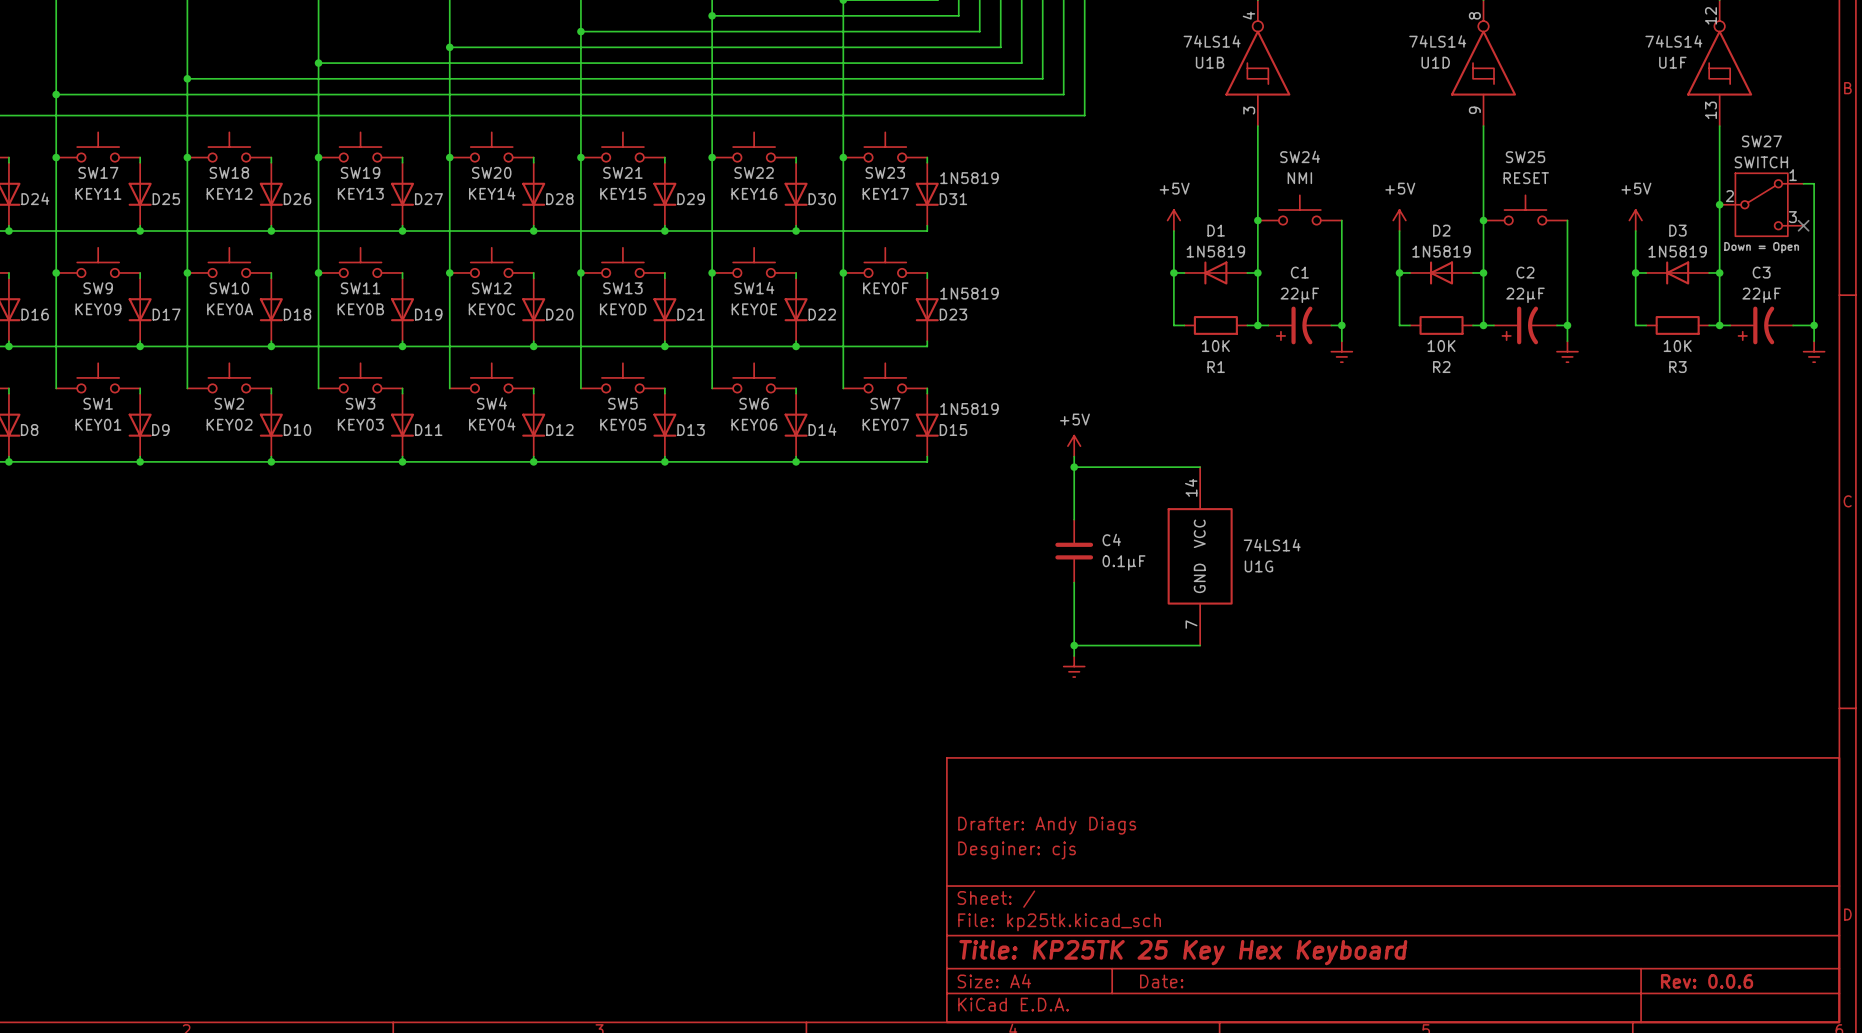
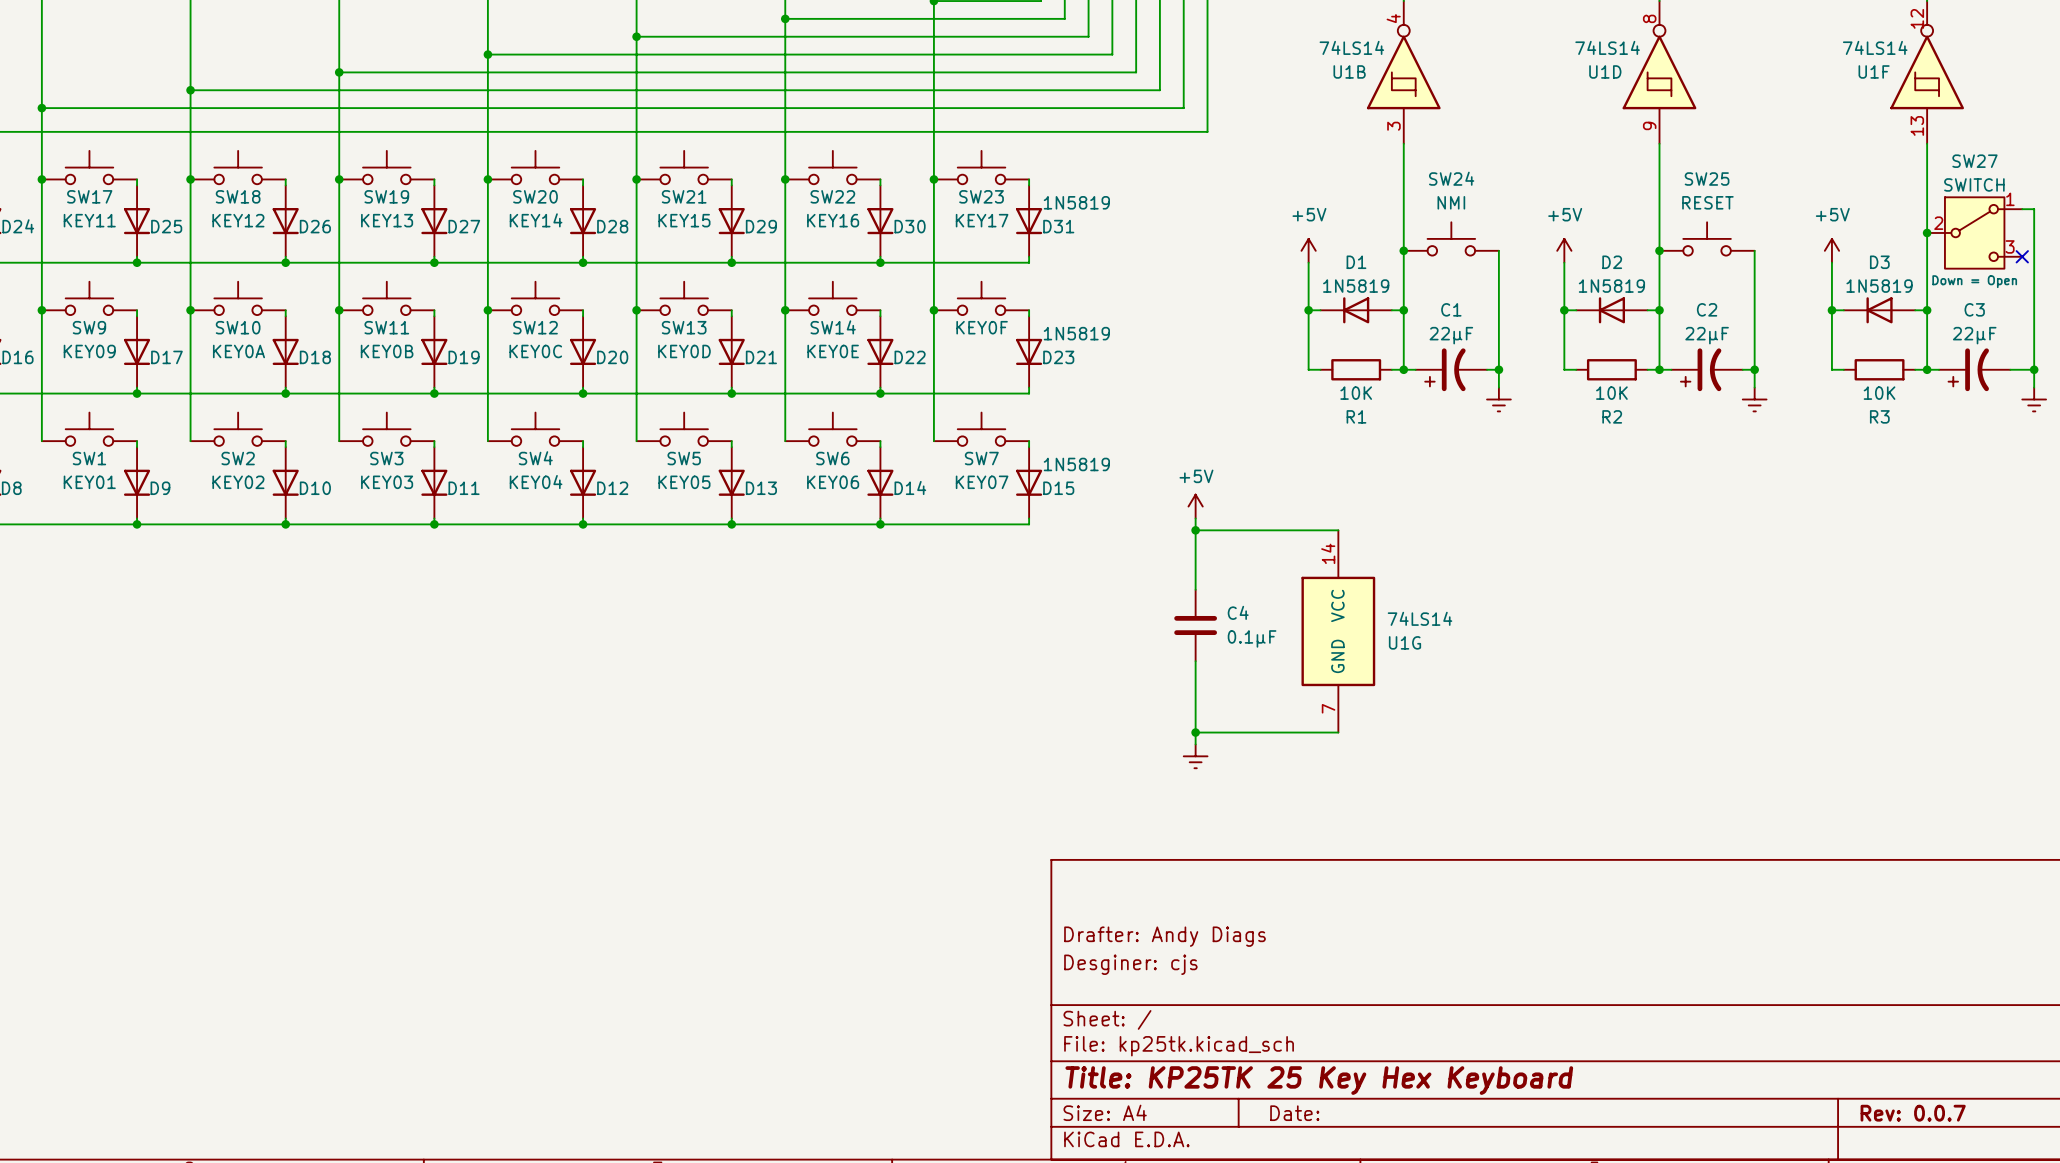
title block: Rev: 0.0.6 (1707, 981) -> Rev: 0.0.7 (1913, 1113)

